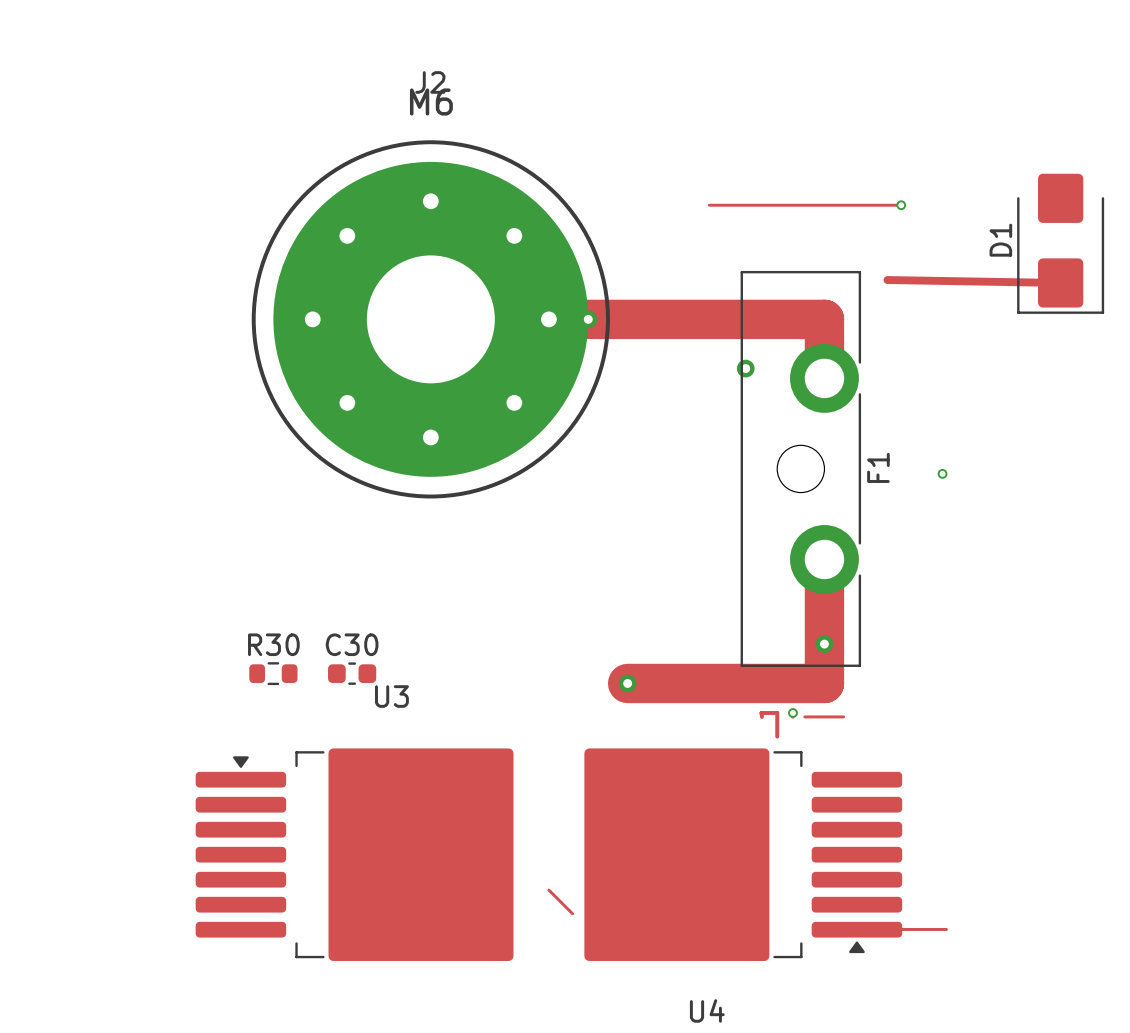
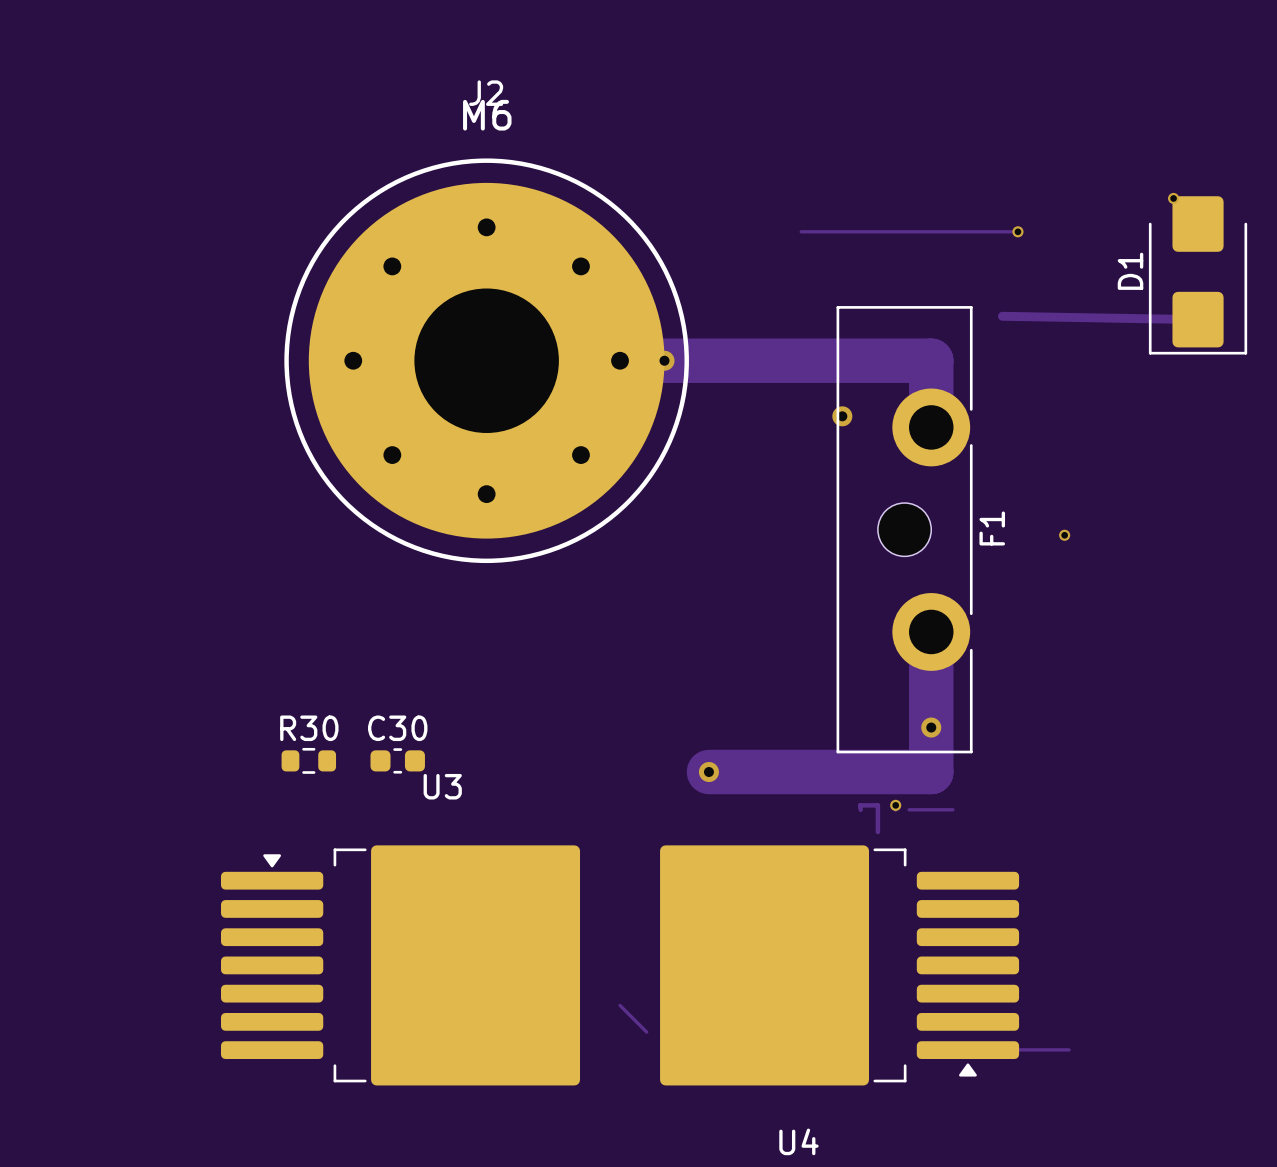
via: none -> (1173, 198)

